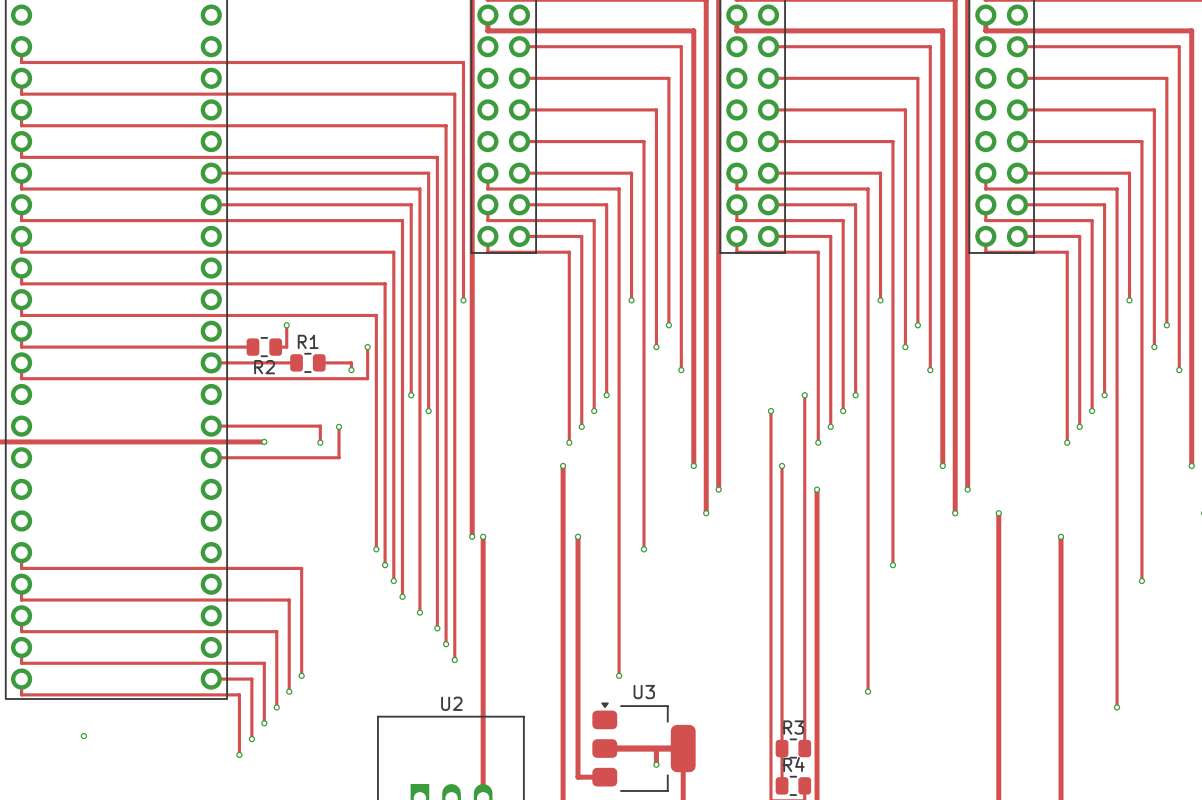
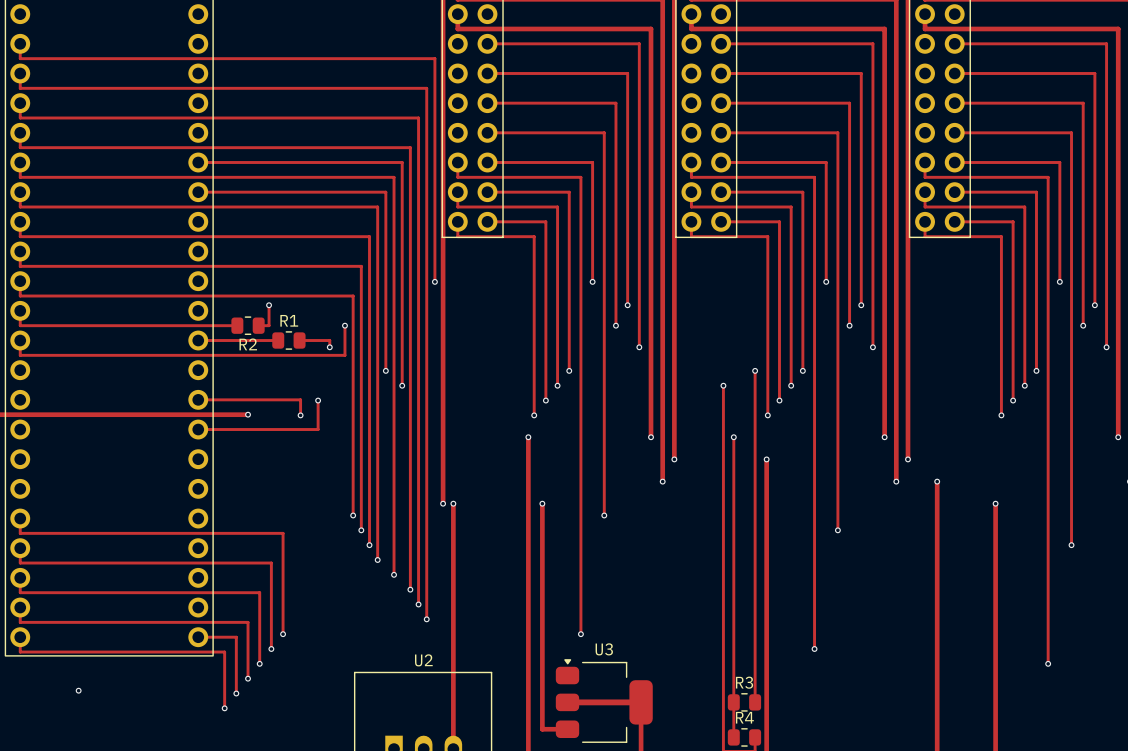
track: (656, 748) (656, 764) -> none
via: (656, 764) -> none

